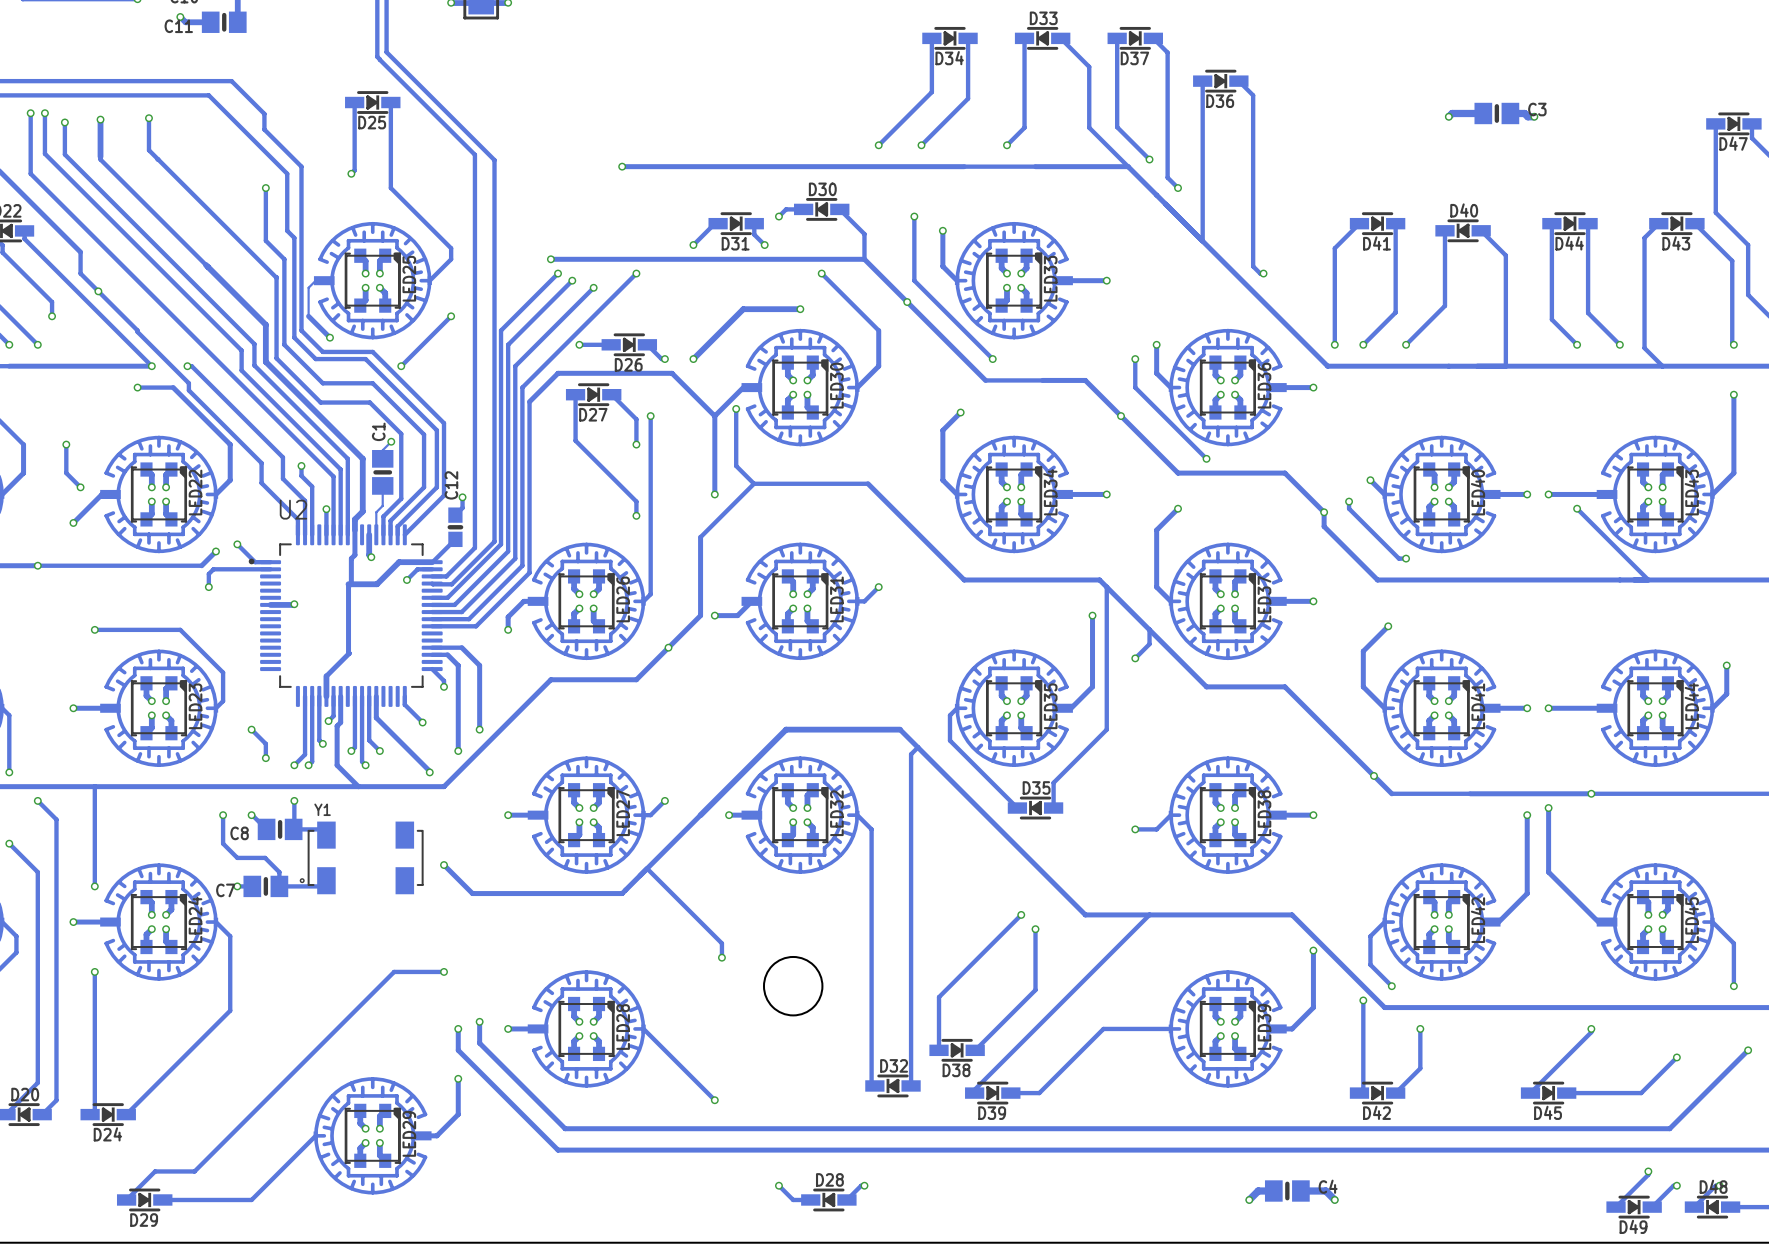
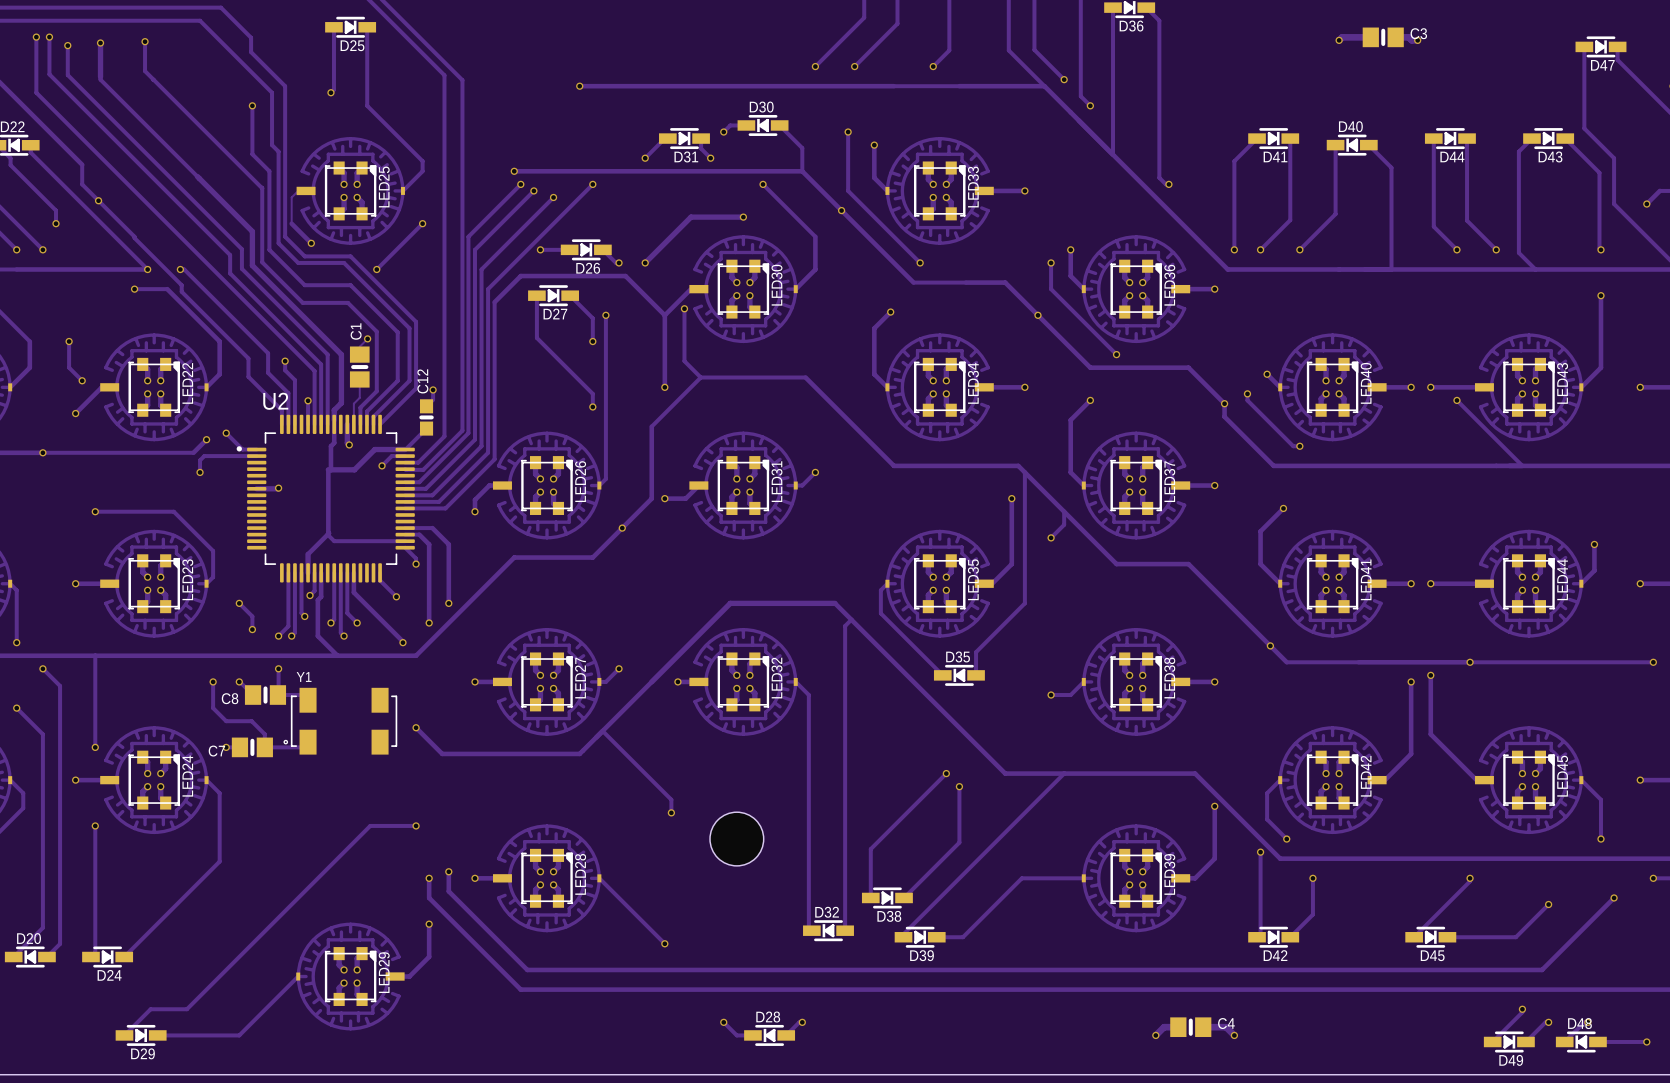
track: none -> (327, 534) (334, 541) (405, 541)

